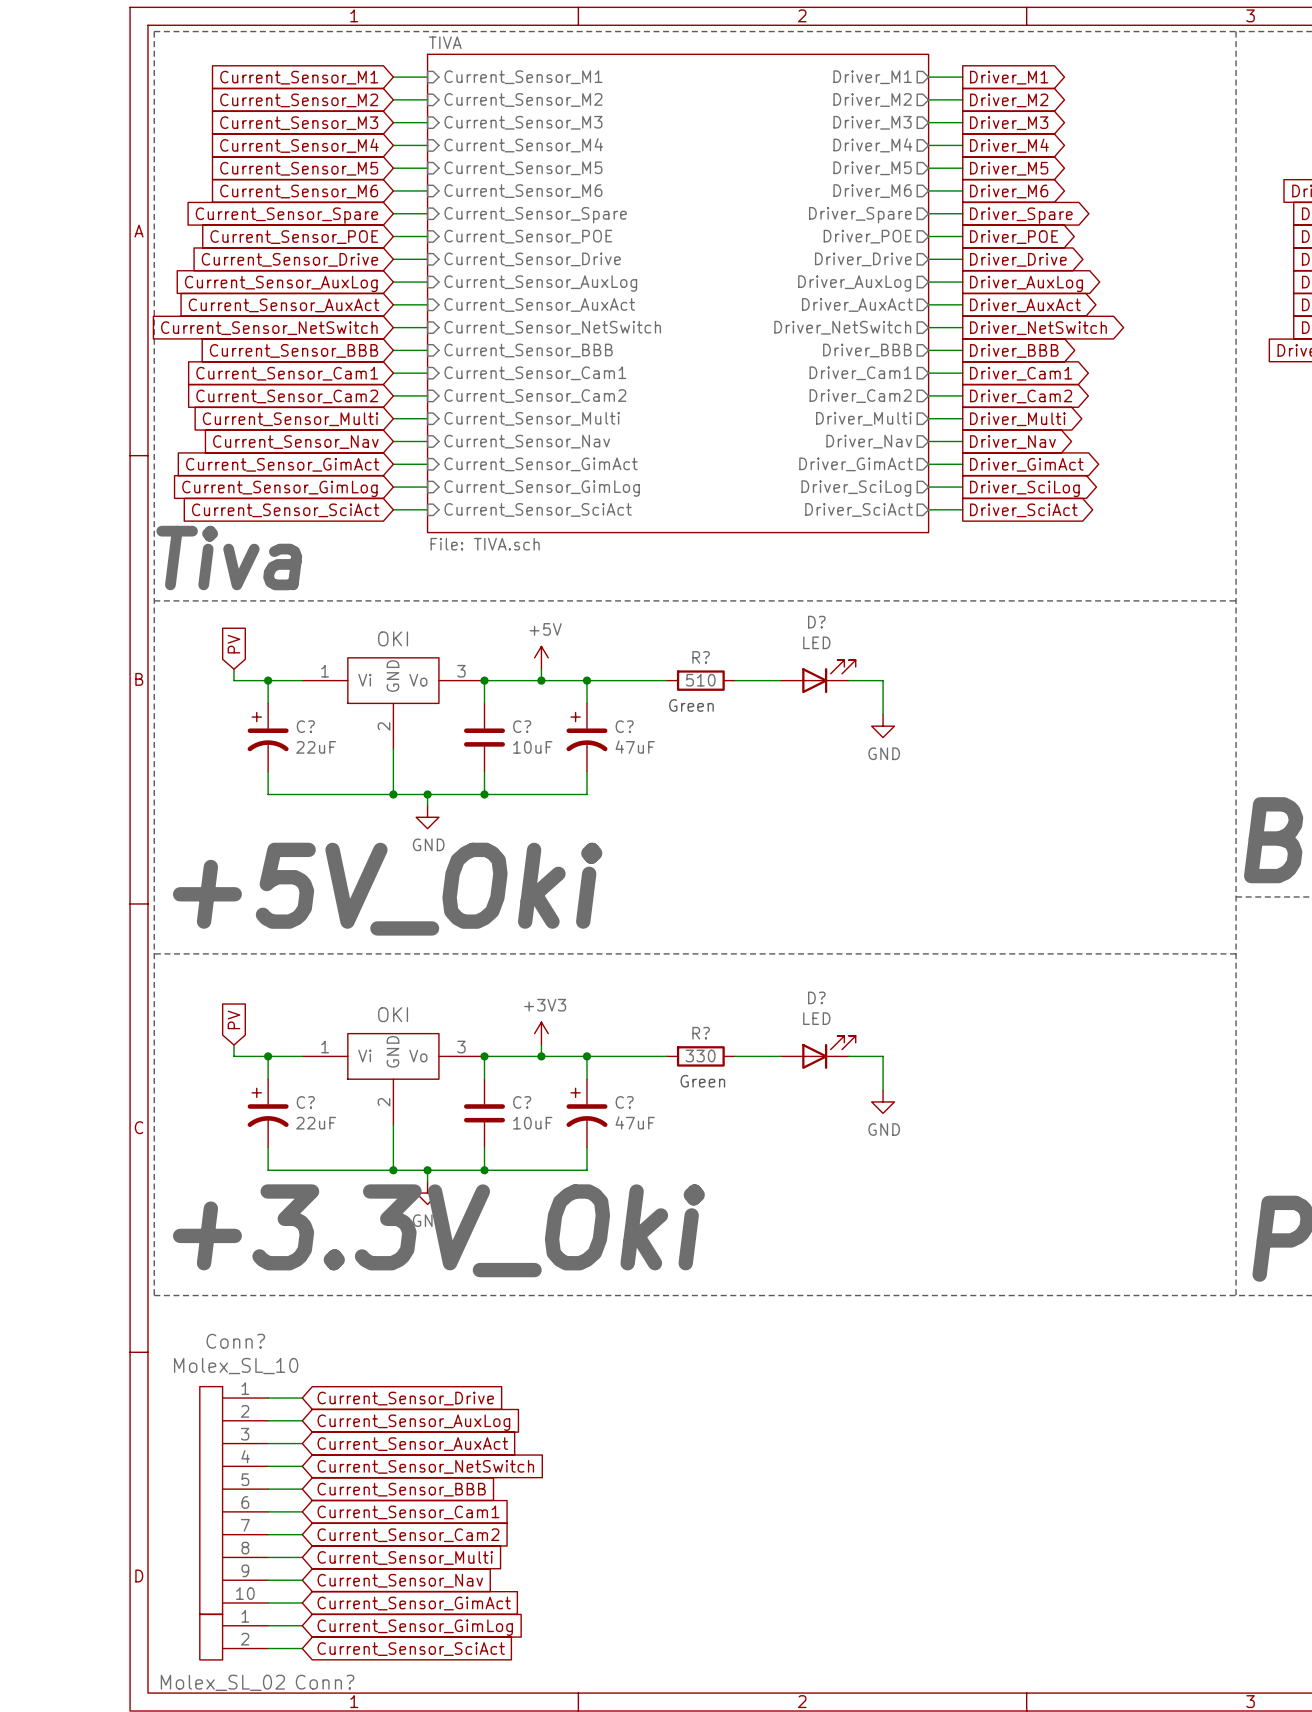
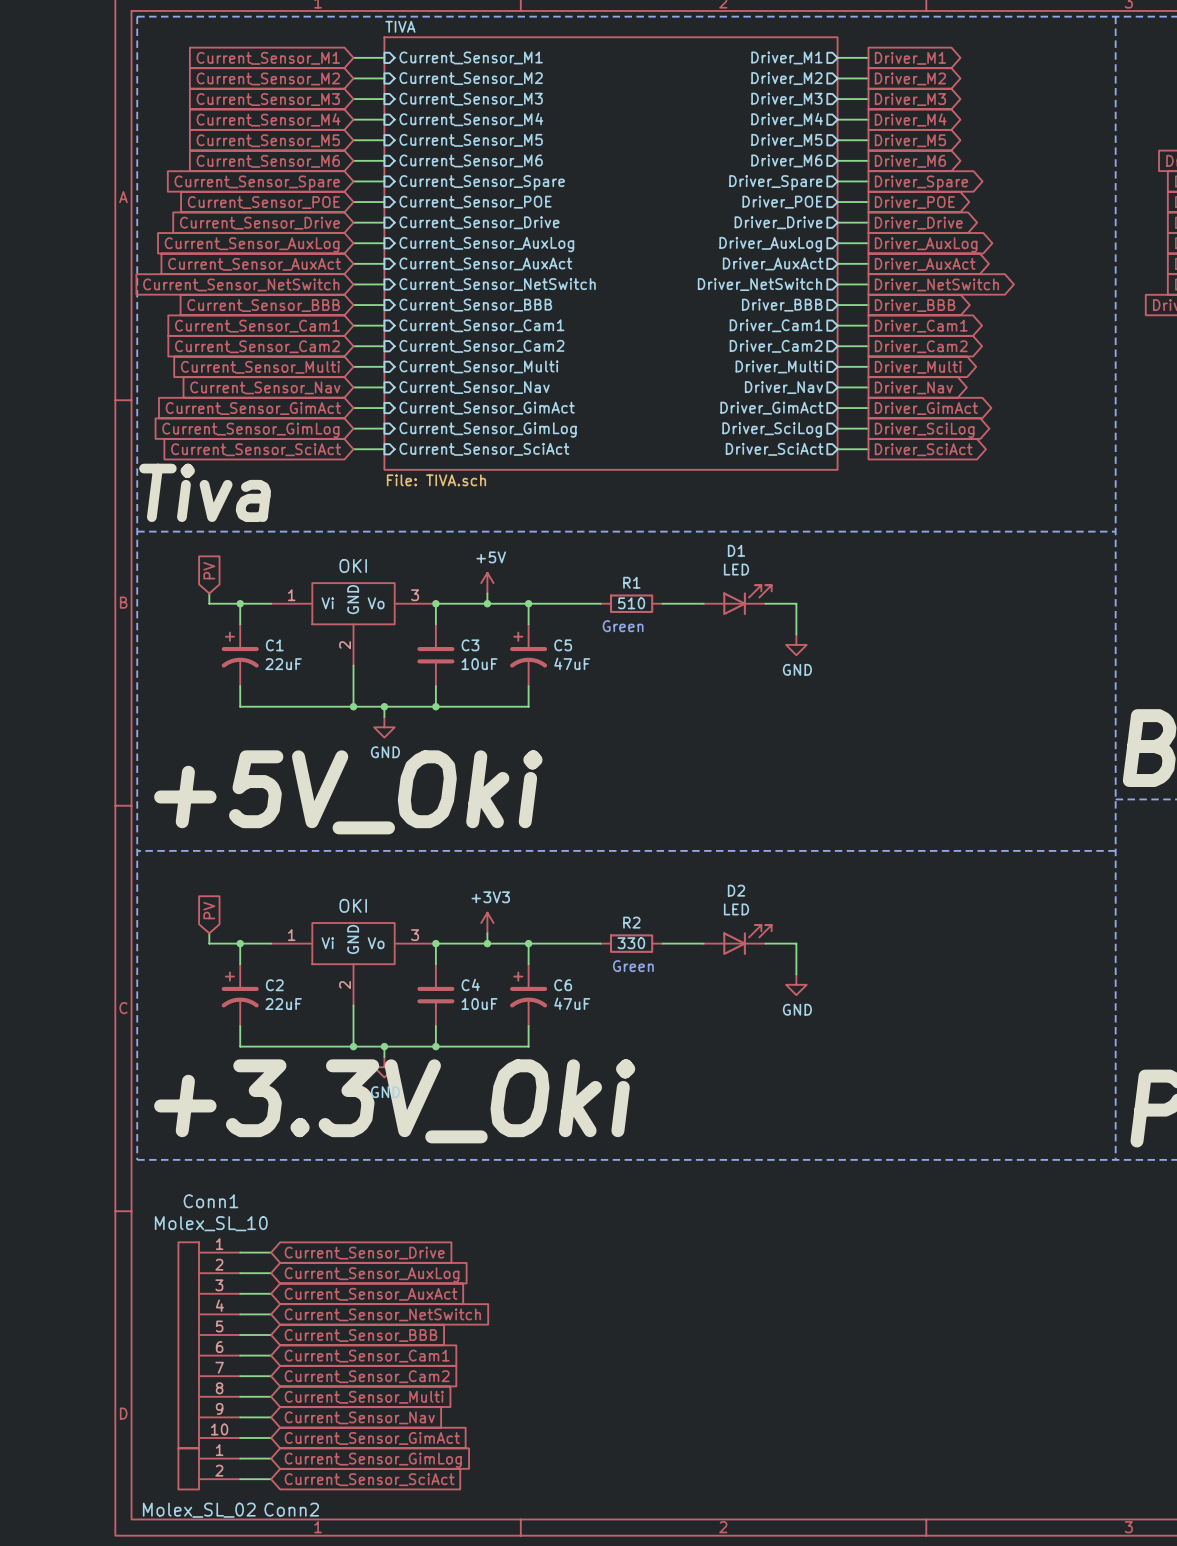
D? name: D? (816, 622) -> D1 (736, 550)
R? name: R? (701, 657) -> R1 (631, 582)
C? name: C? (305, 726) -> C1 (274, 645)
C? name: C? (522, 726) -> C3 (470, 645)
C? name: C? (624, 726) -> C5 (563, 645)
D? name: D? (816, 997) -> D2 (736, 890)
R? name: R? (701, 1033) -> R2 (631, 922)
C? name: C? (305, 1102) -> C2 (274, 985)
C? name: C? (522, 1102) -> C4 (470, 985)
C? name: C? (624, 1102) -> C6 (563, 985)
Conn? name: Conn? (235, 1341) -> Conn1 (210, 1201)
Conn? name: Conn? (325, 1682) -> Conn2 (291, 1509)

